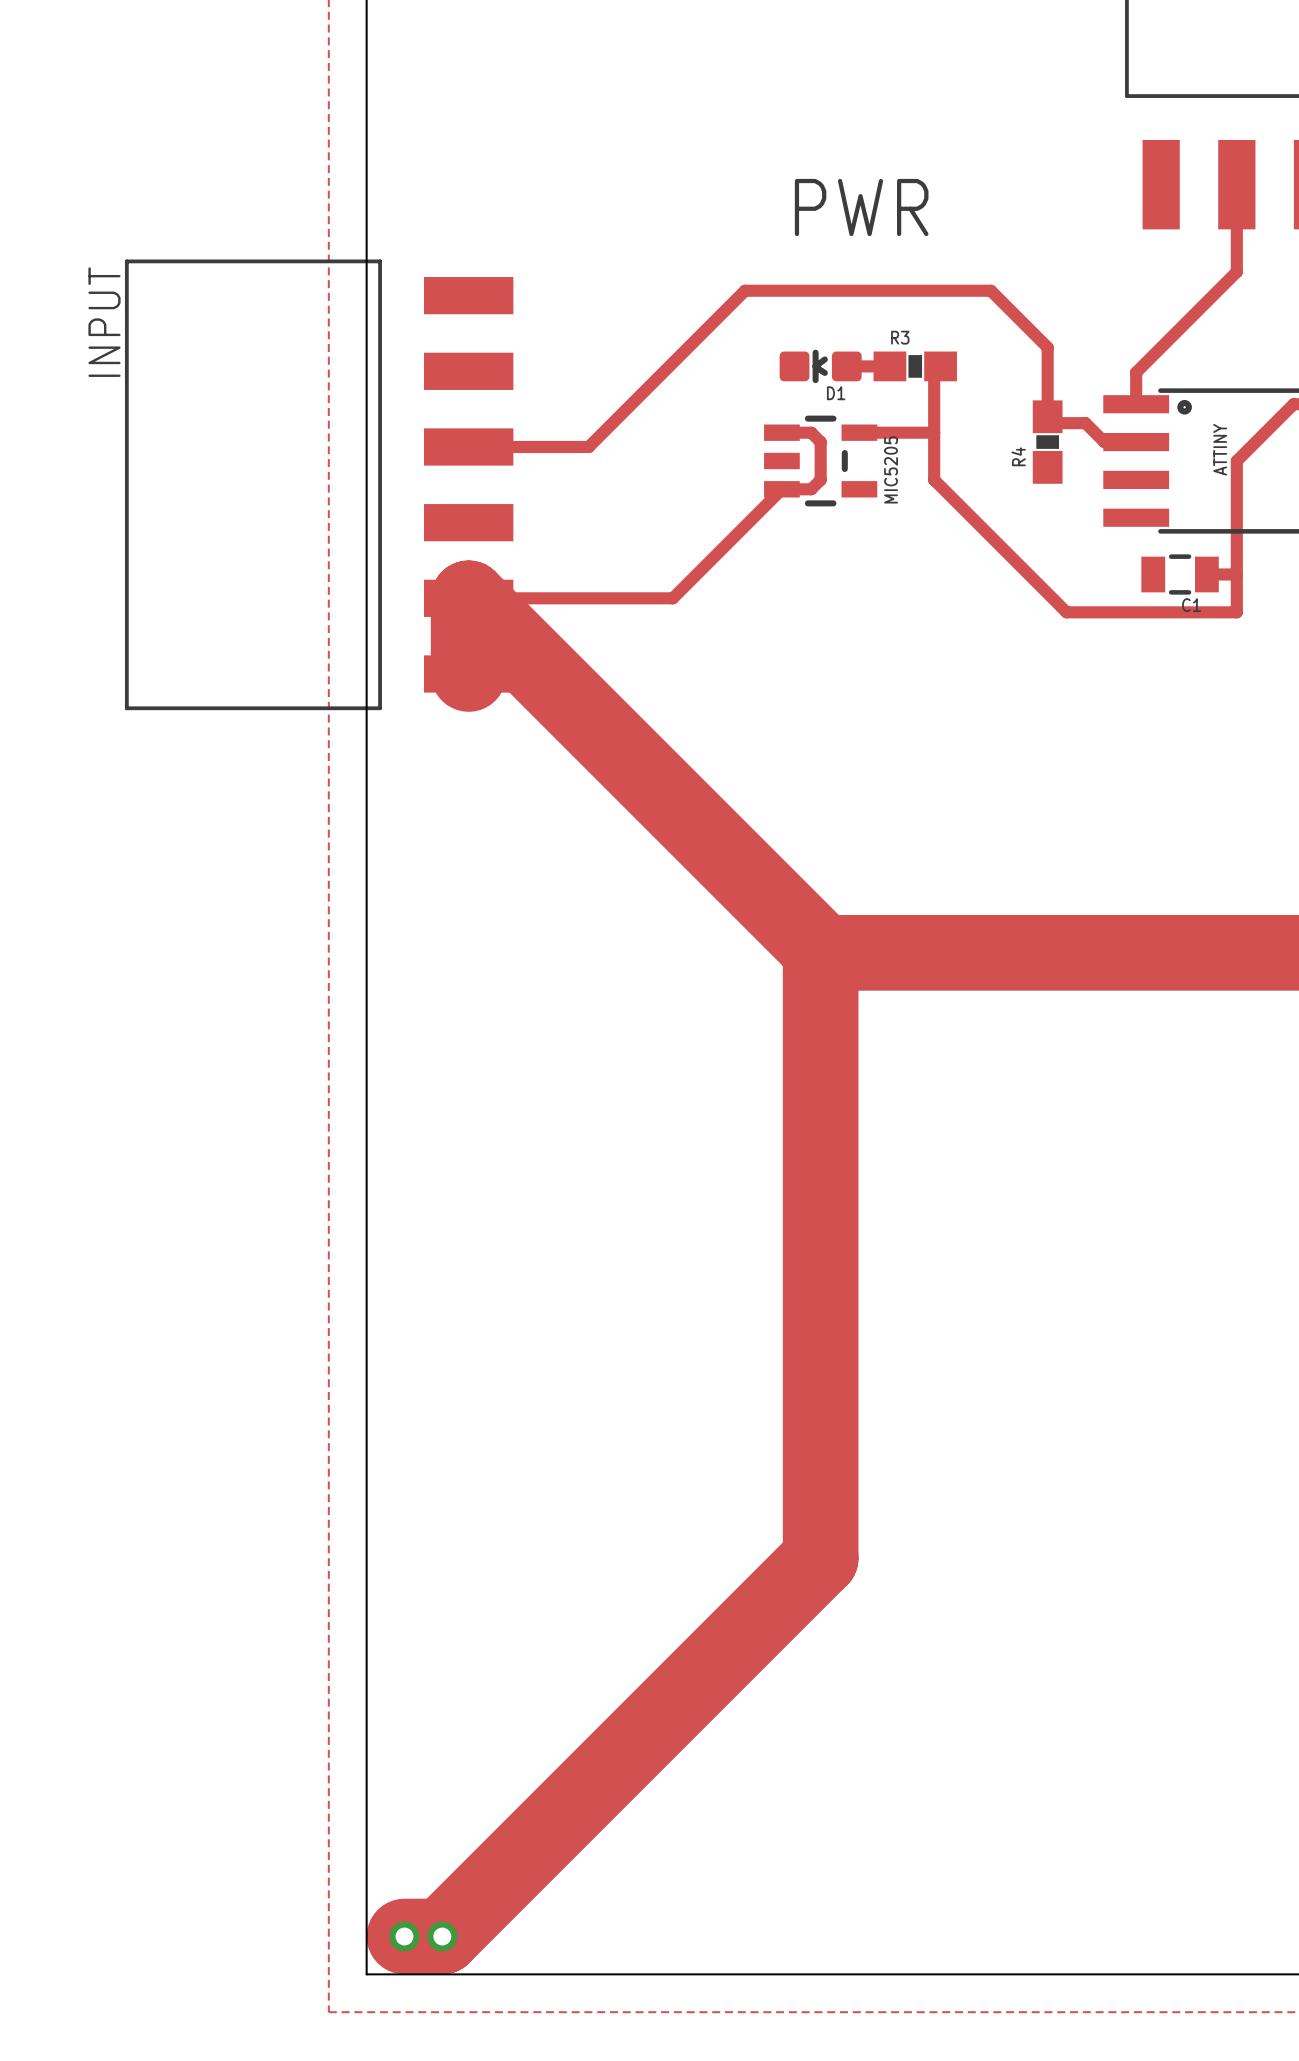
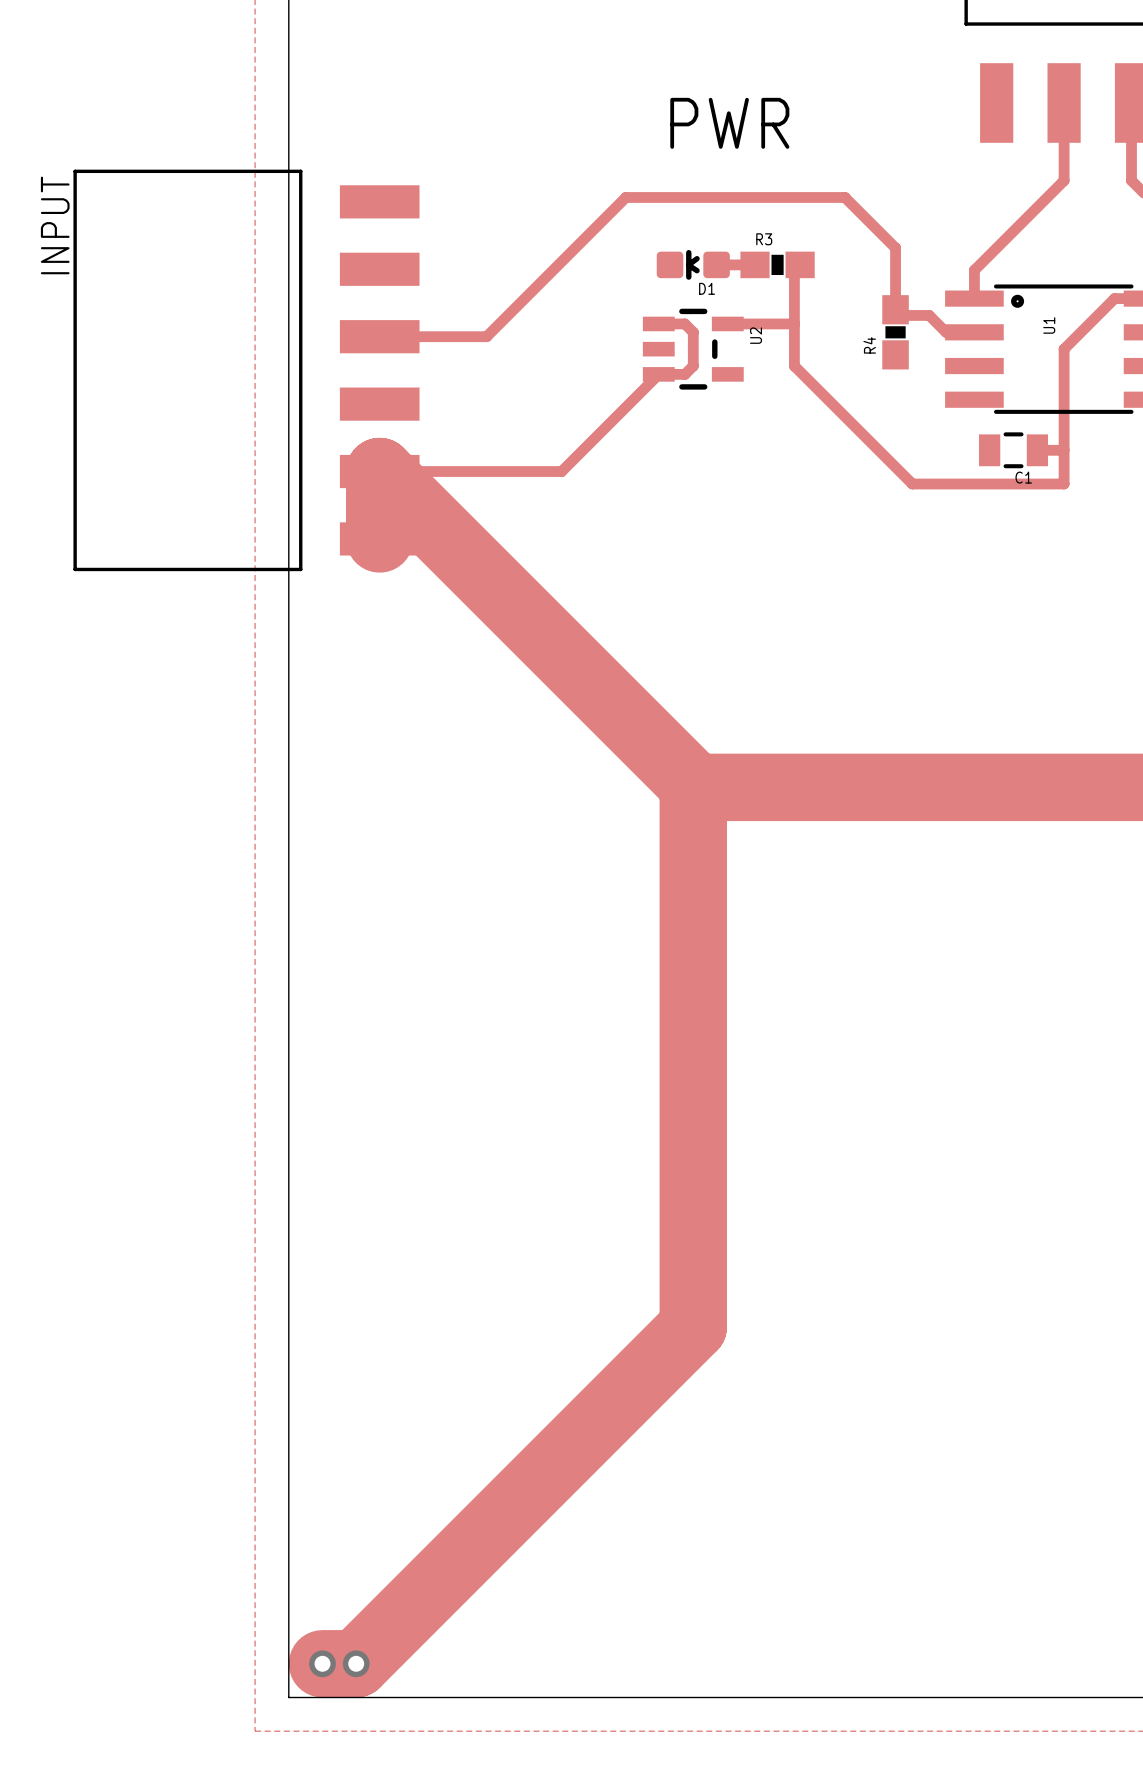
ATTINY name: ATTINY (1220, 449) -> U1 (1049, 325)
MIC5205 name: MIC5205 (891, 469) -> U2 (755, 335)

